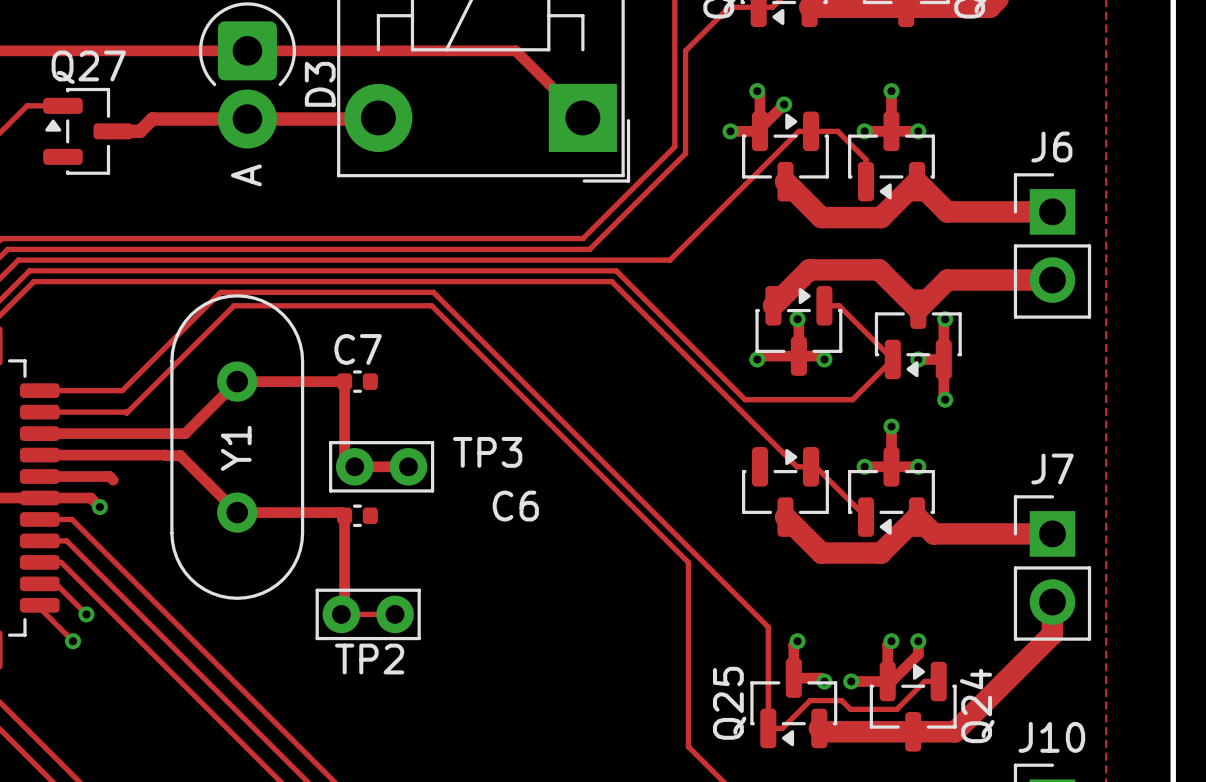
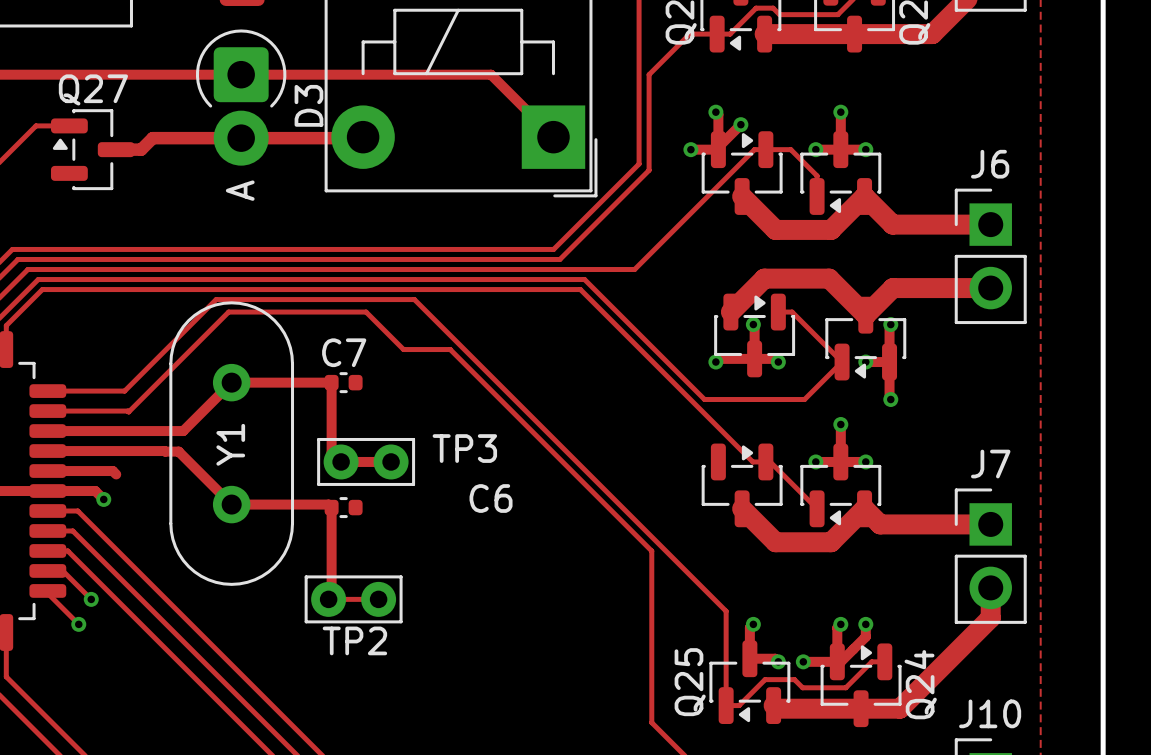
track: (381, 305) (431, 305) (472, 346) -> (366, 312) (403, 349) (450, 349)

